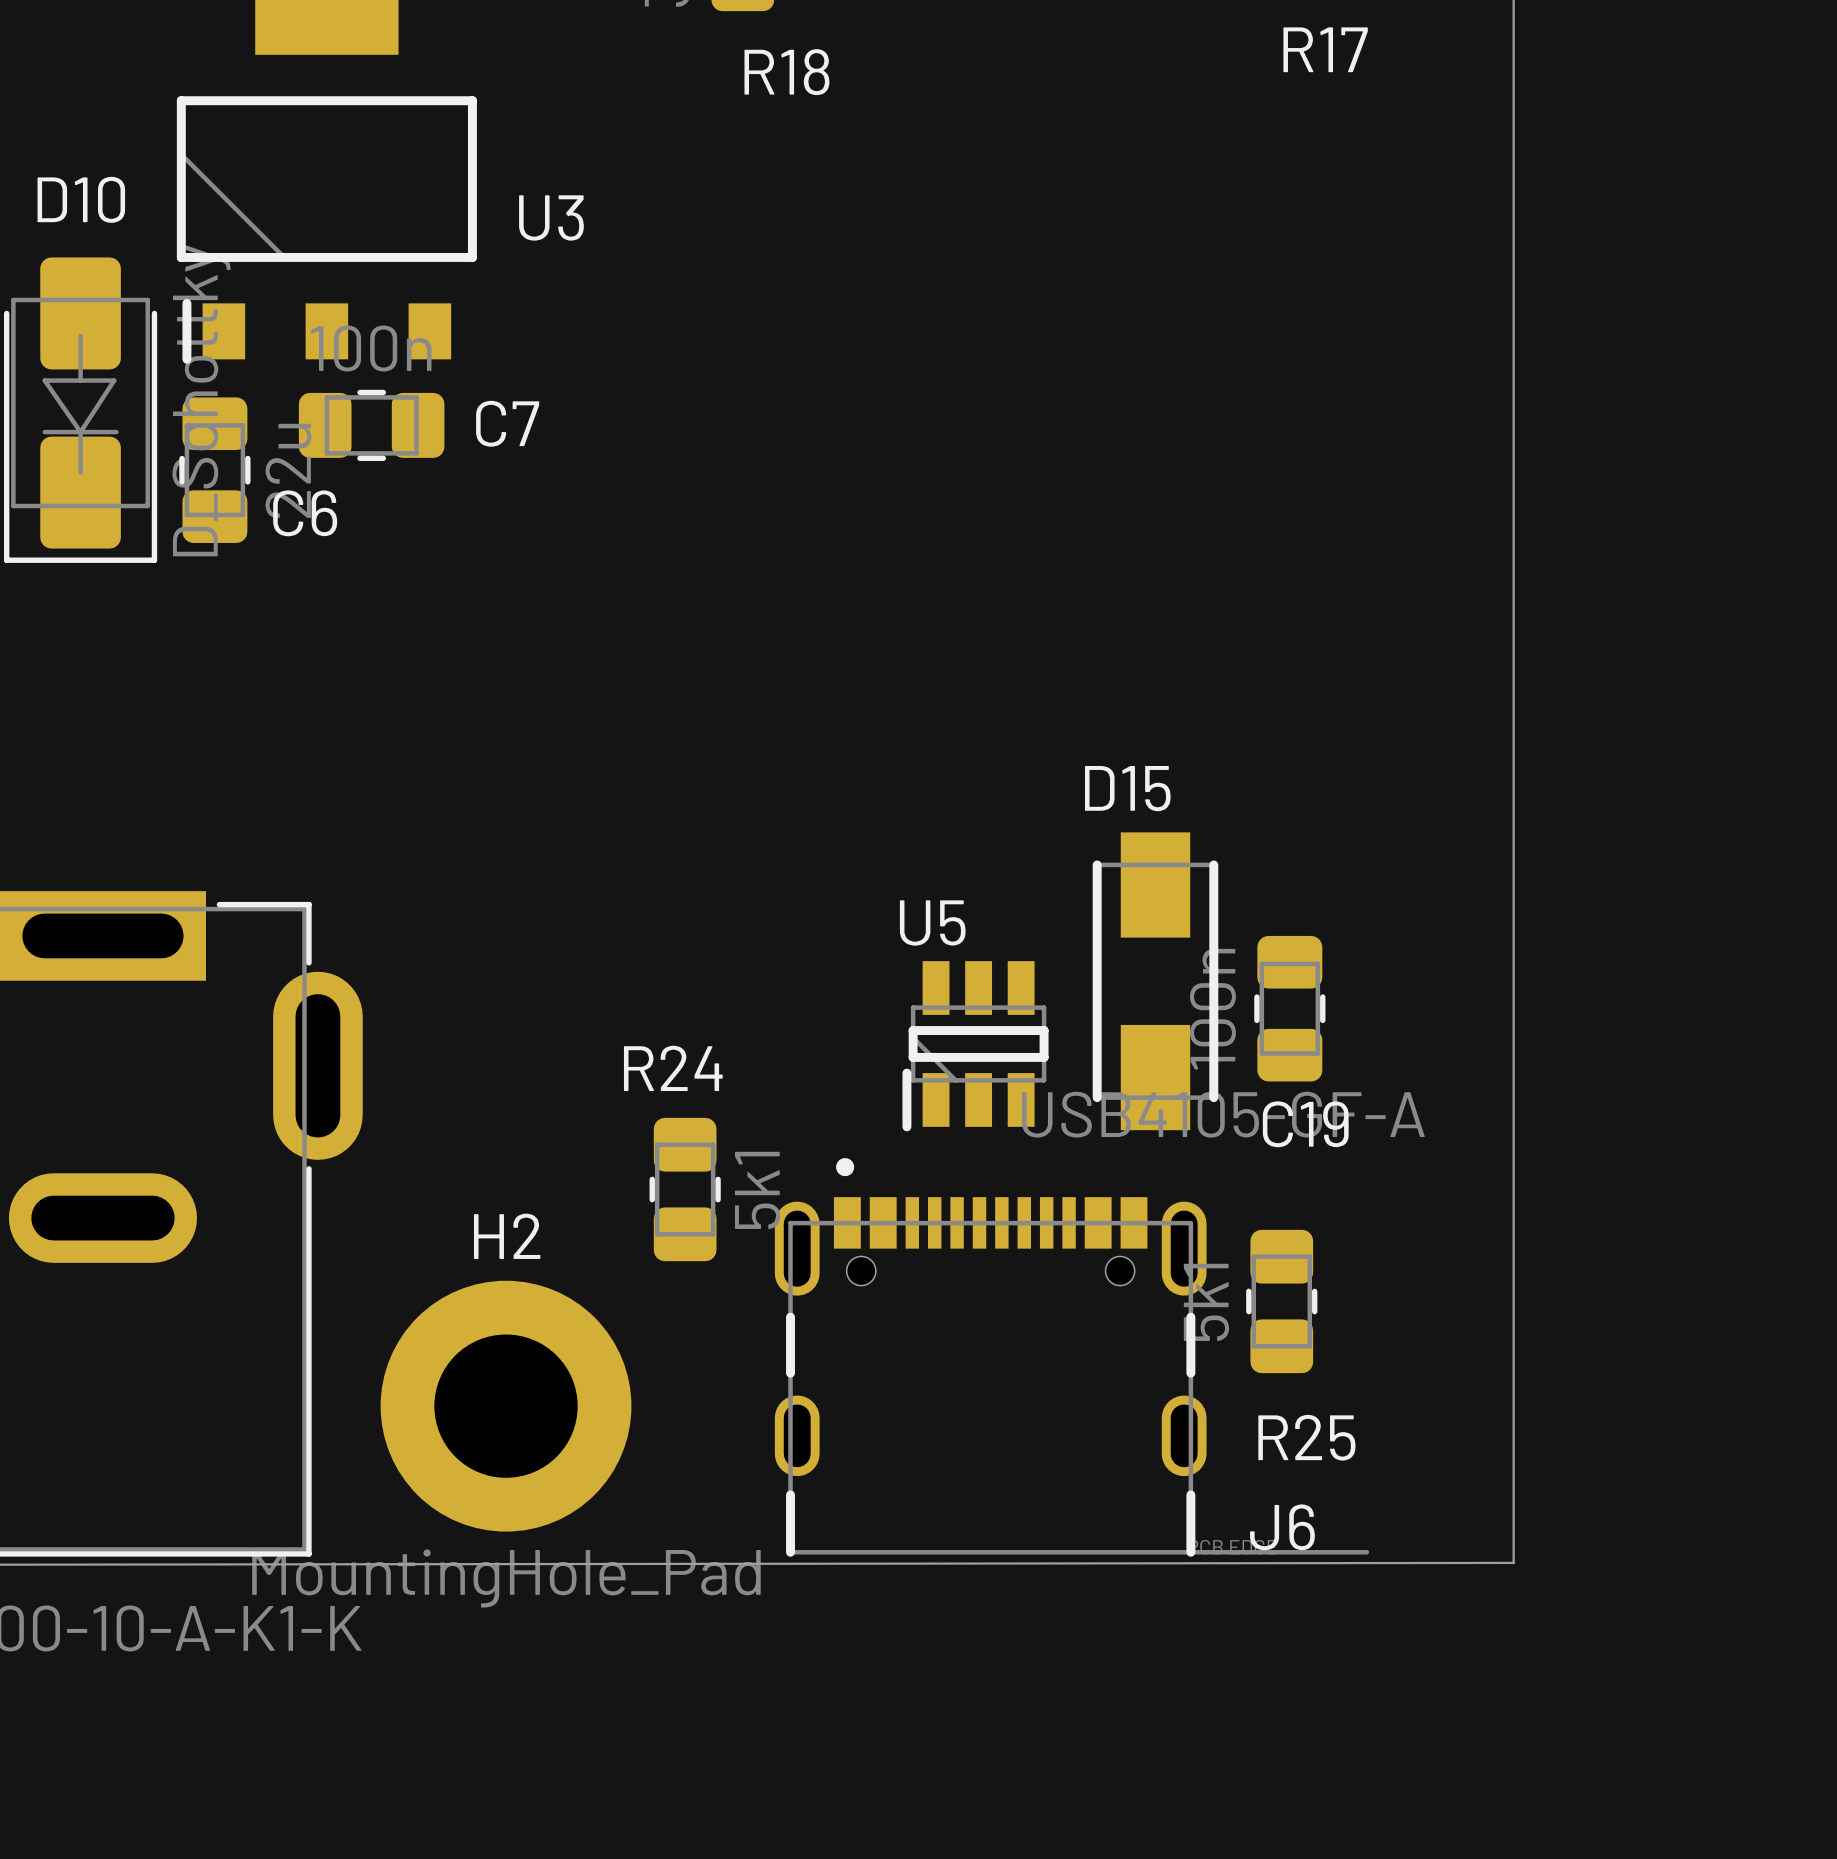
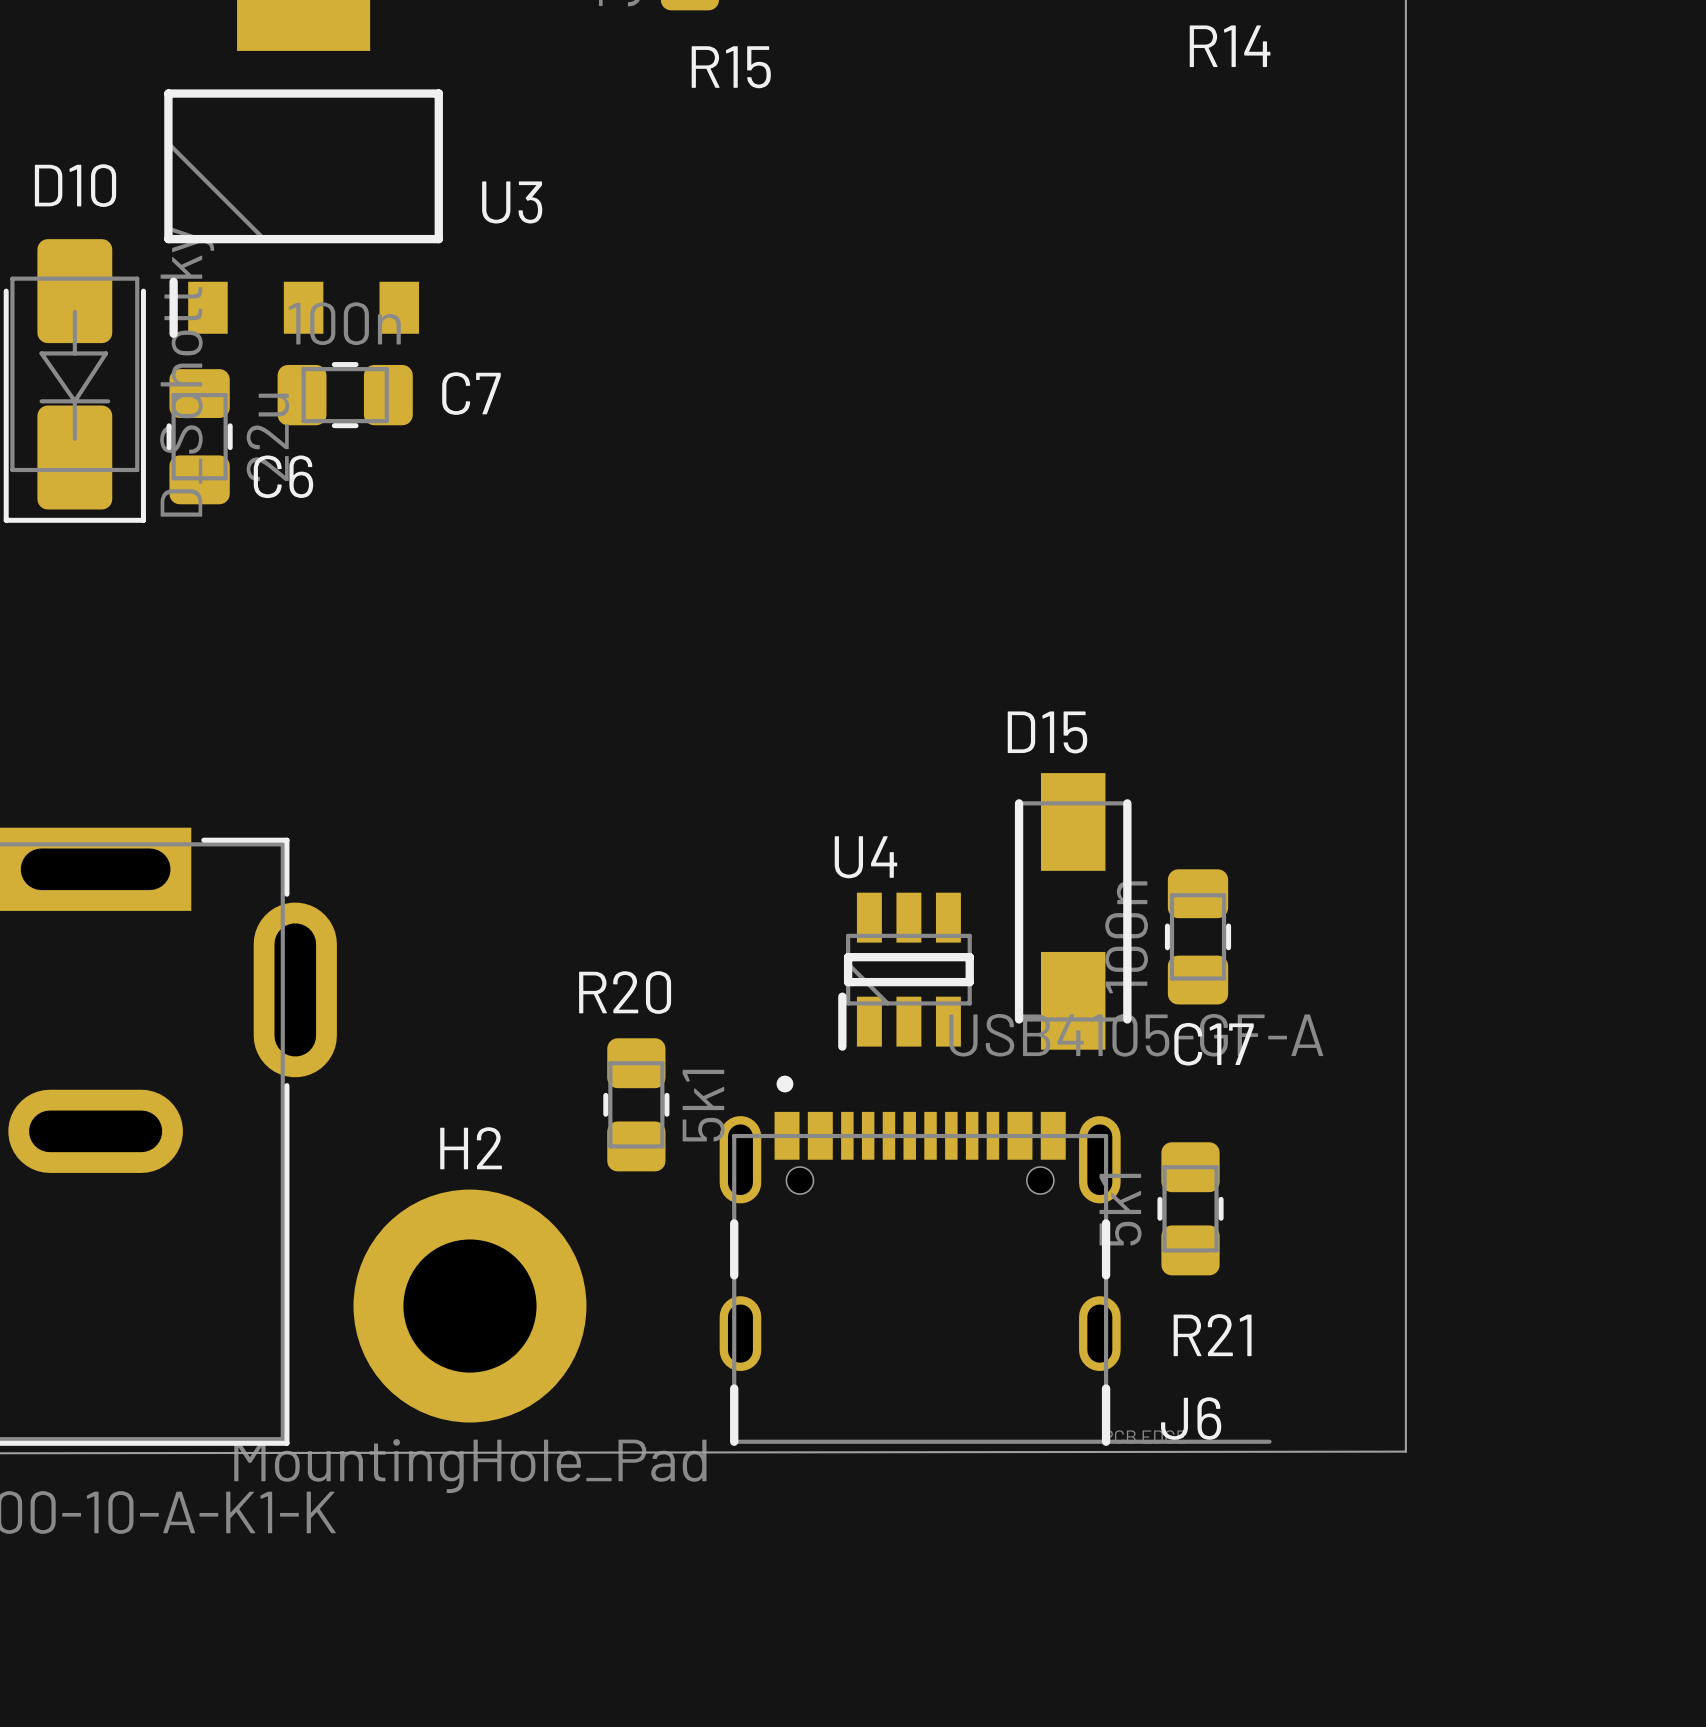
R17 name: R17 (1325, 49) -> R14 (1230, 46)
R18 name: R18 (786, 72) -> R15 (731, 67)
U5 name: U5 (932, 922) -> U4 (865, 857)
R24 name: R24 (673, 1068) -> R20 (625, 992)
C19 name: C19 (1305, 1124) -> C17 (1214, 1044)
R25 name: R25 (1306, 1437) -> R21 (1212, 1335)

